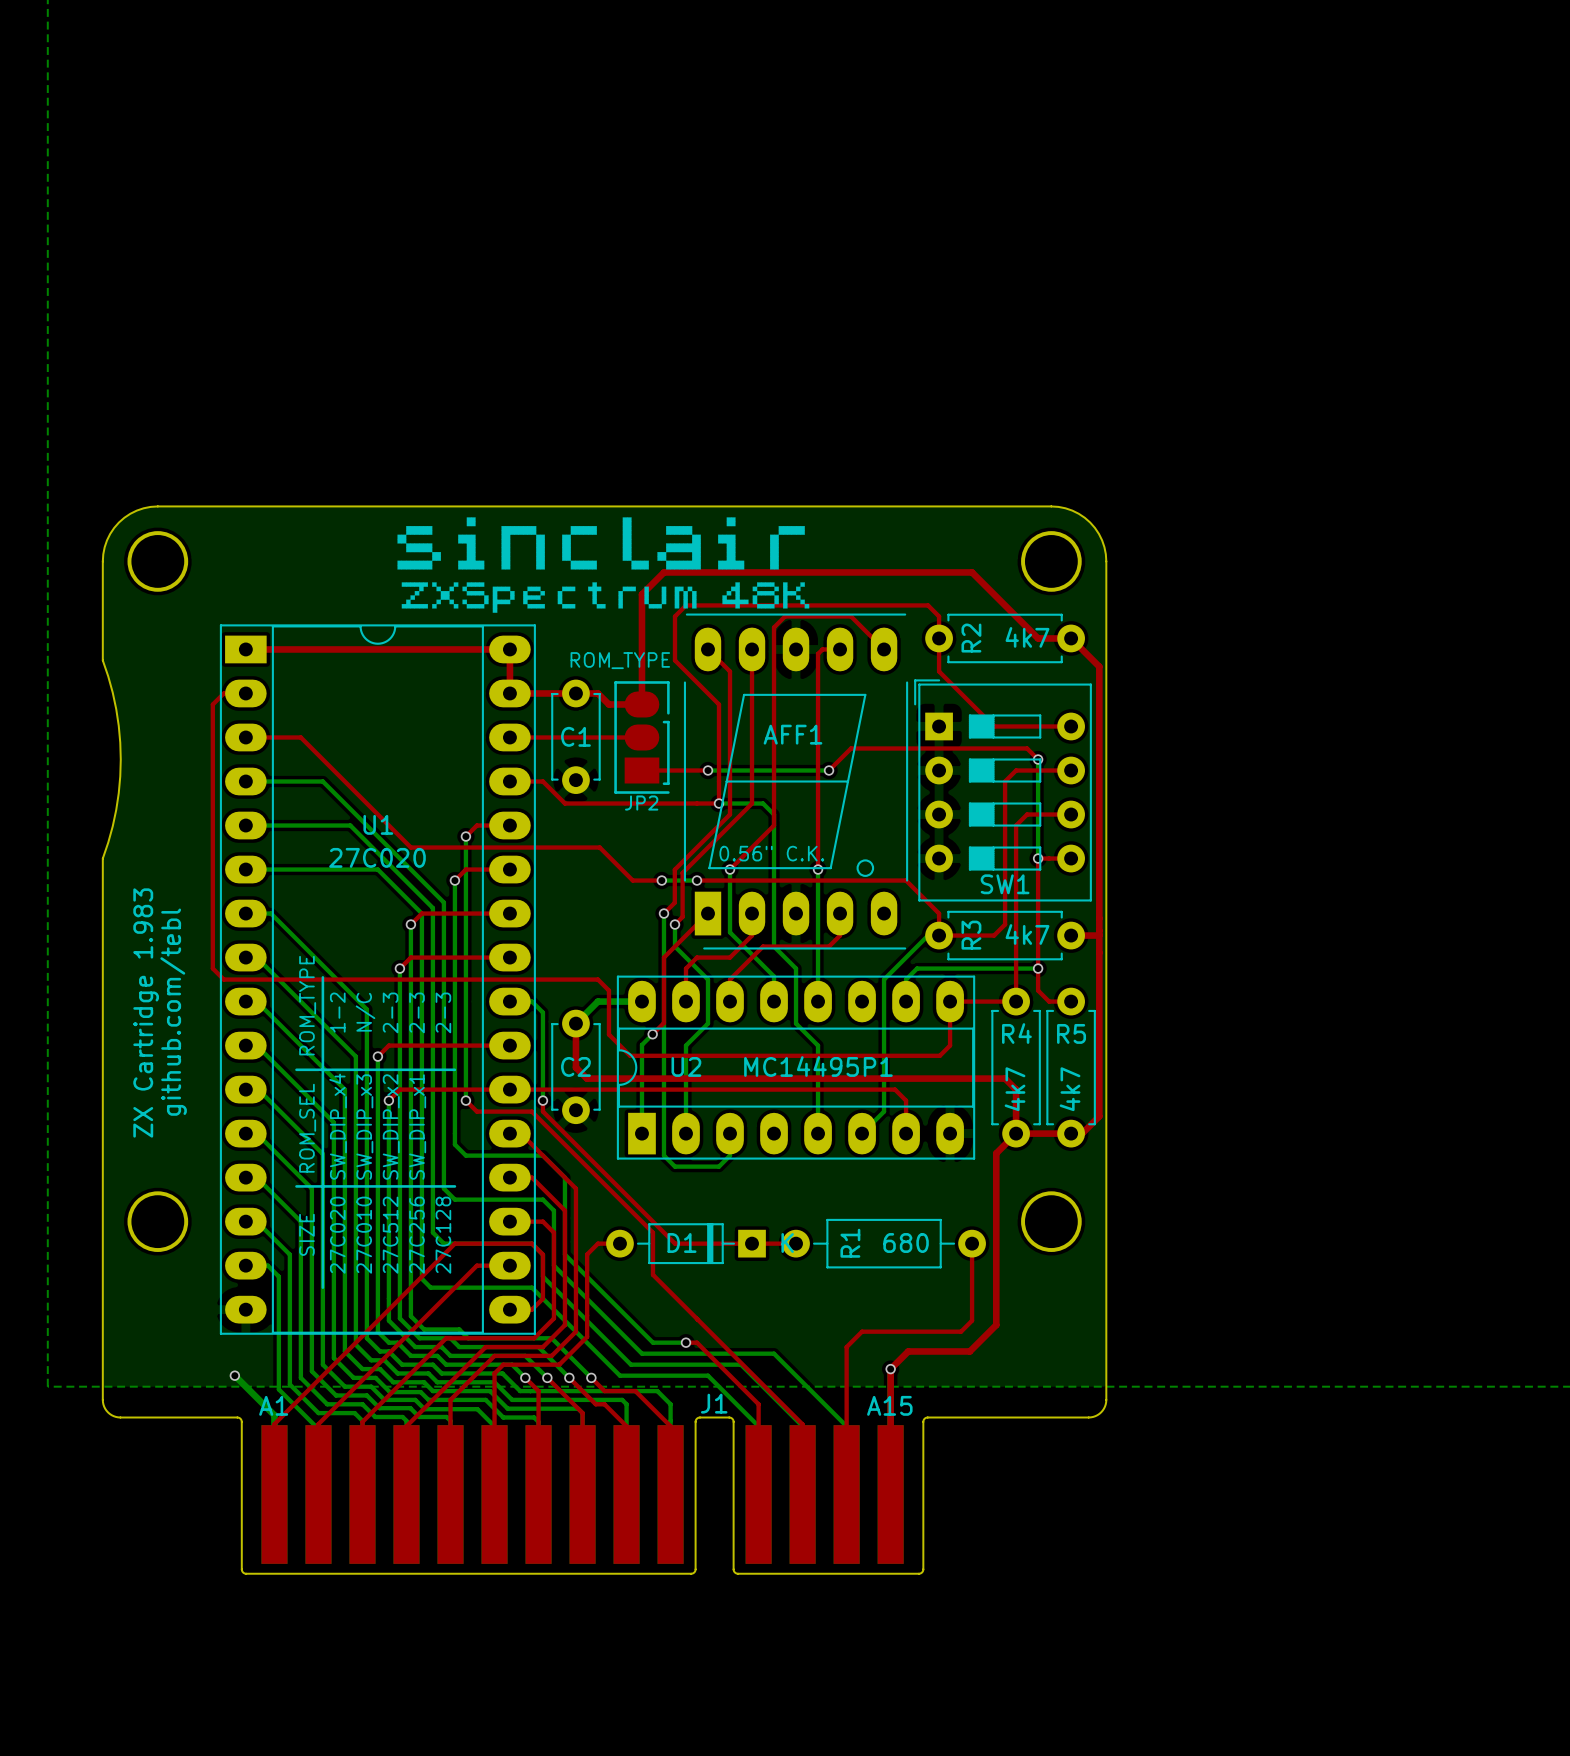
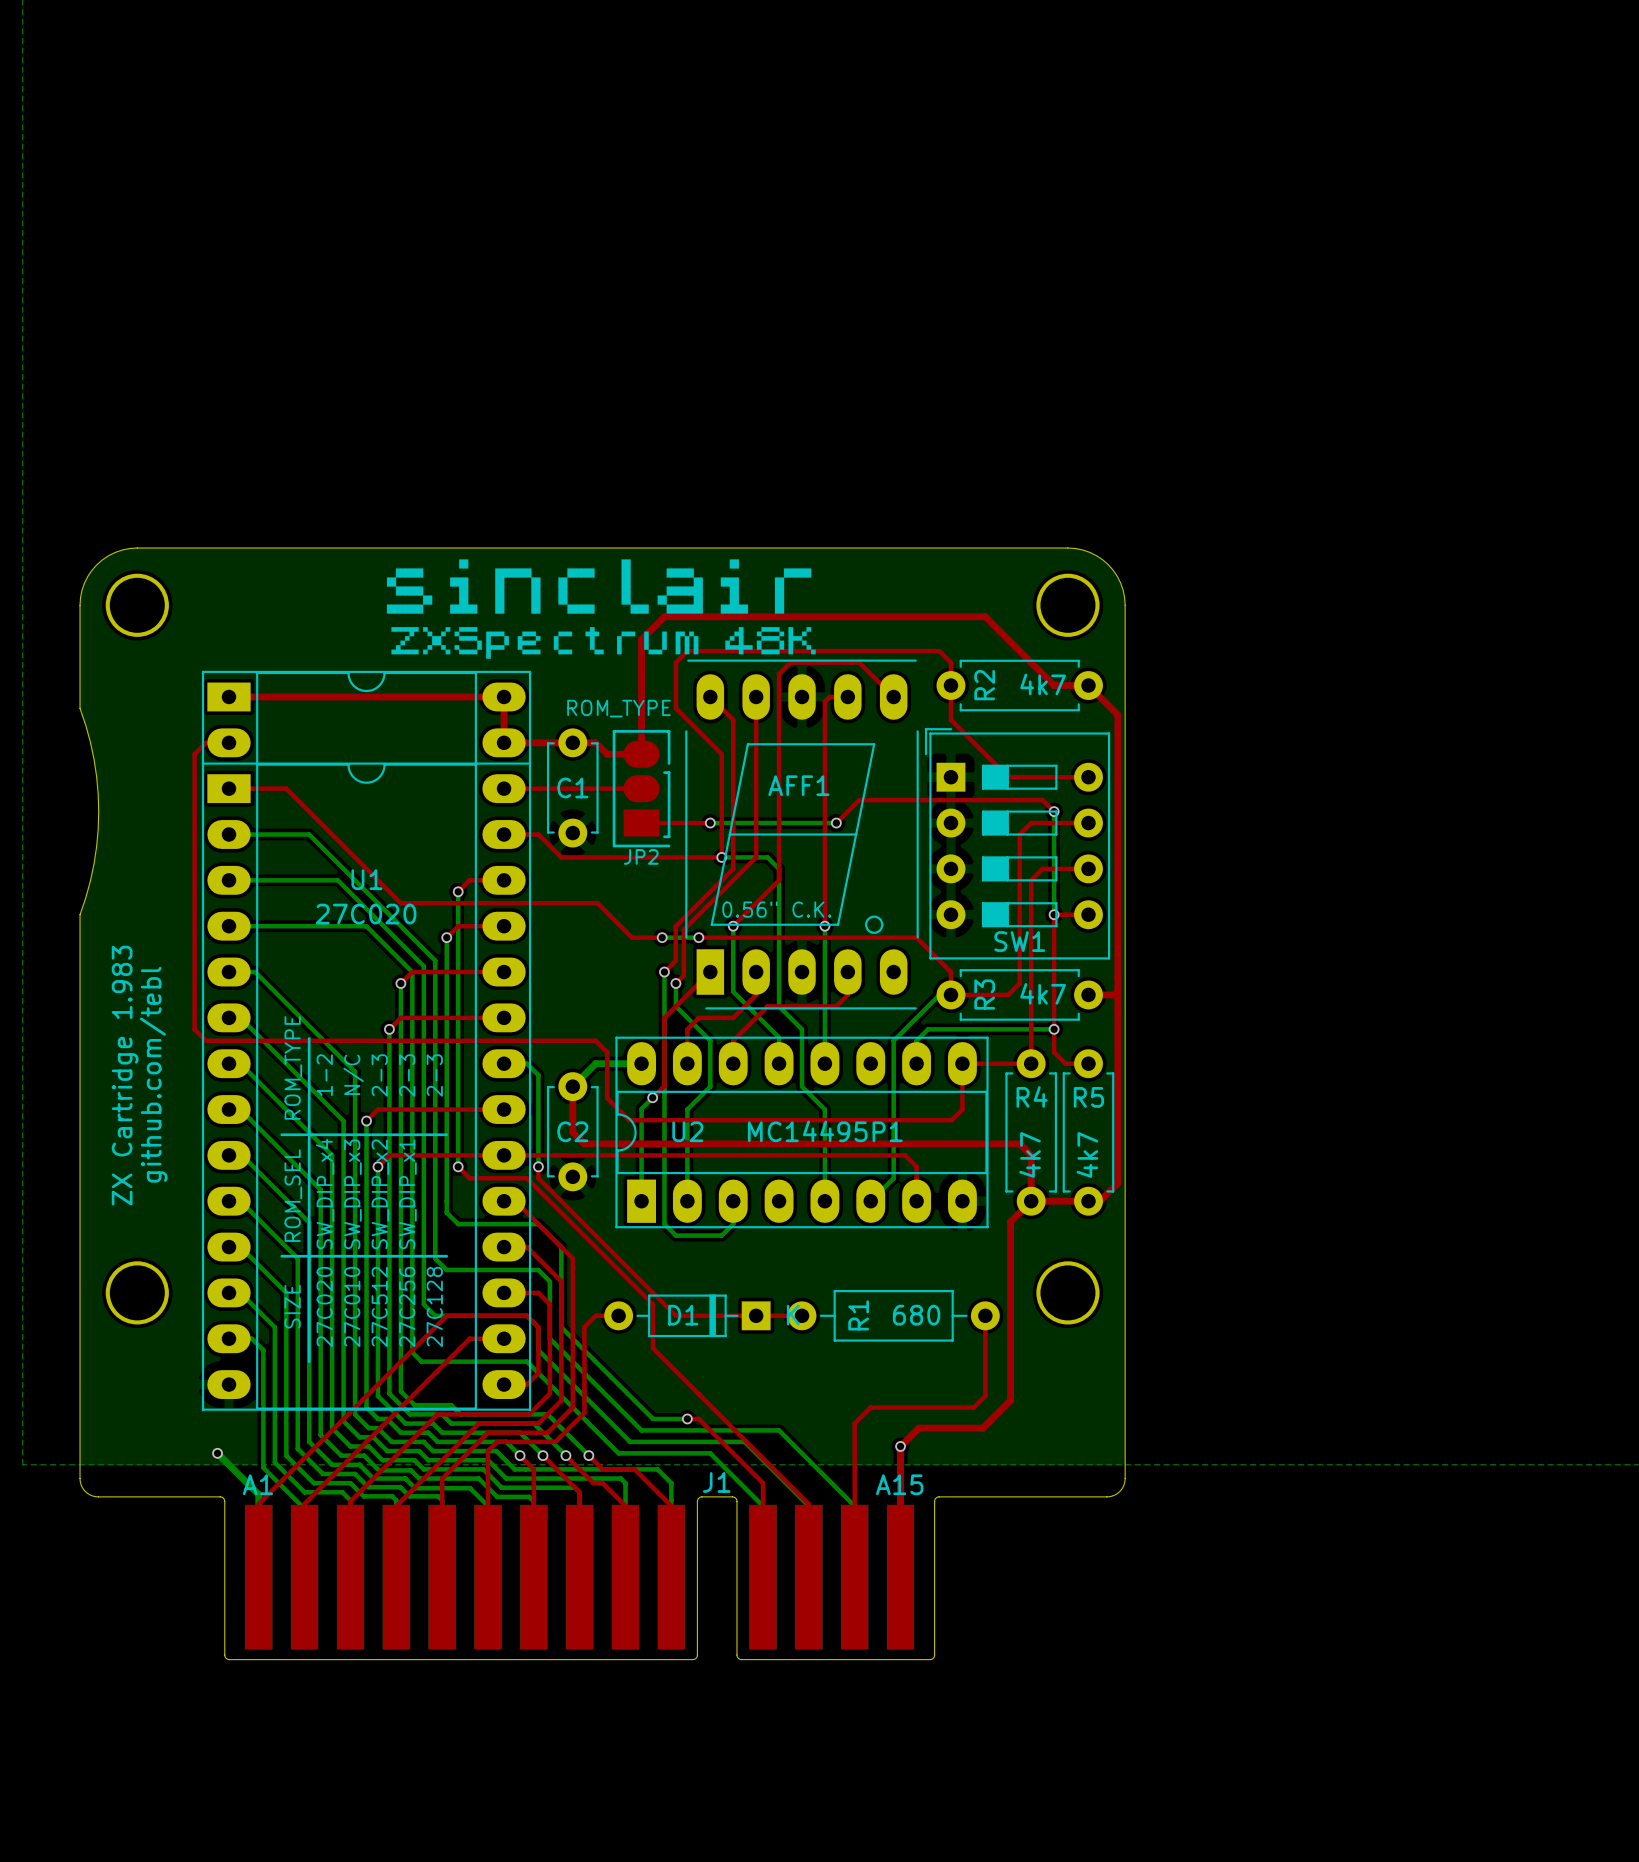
U1 footprint: [219, 624, 536, 1335] -> [201, 670, 532, 1411]

